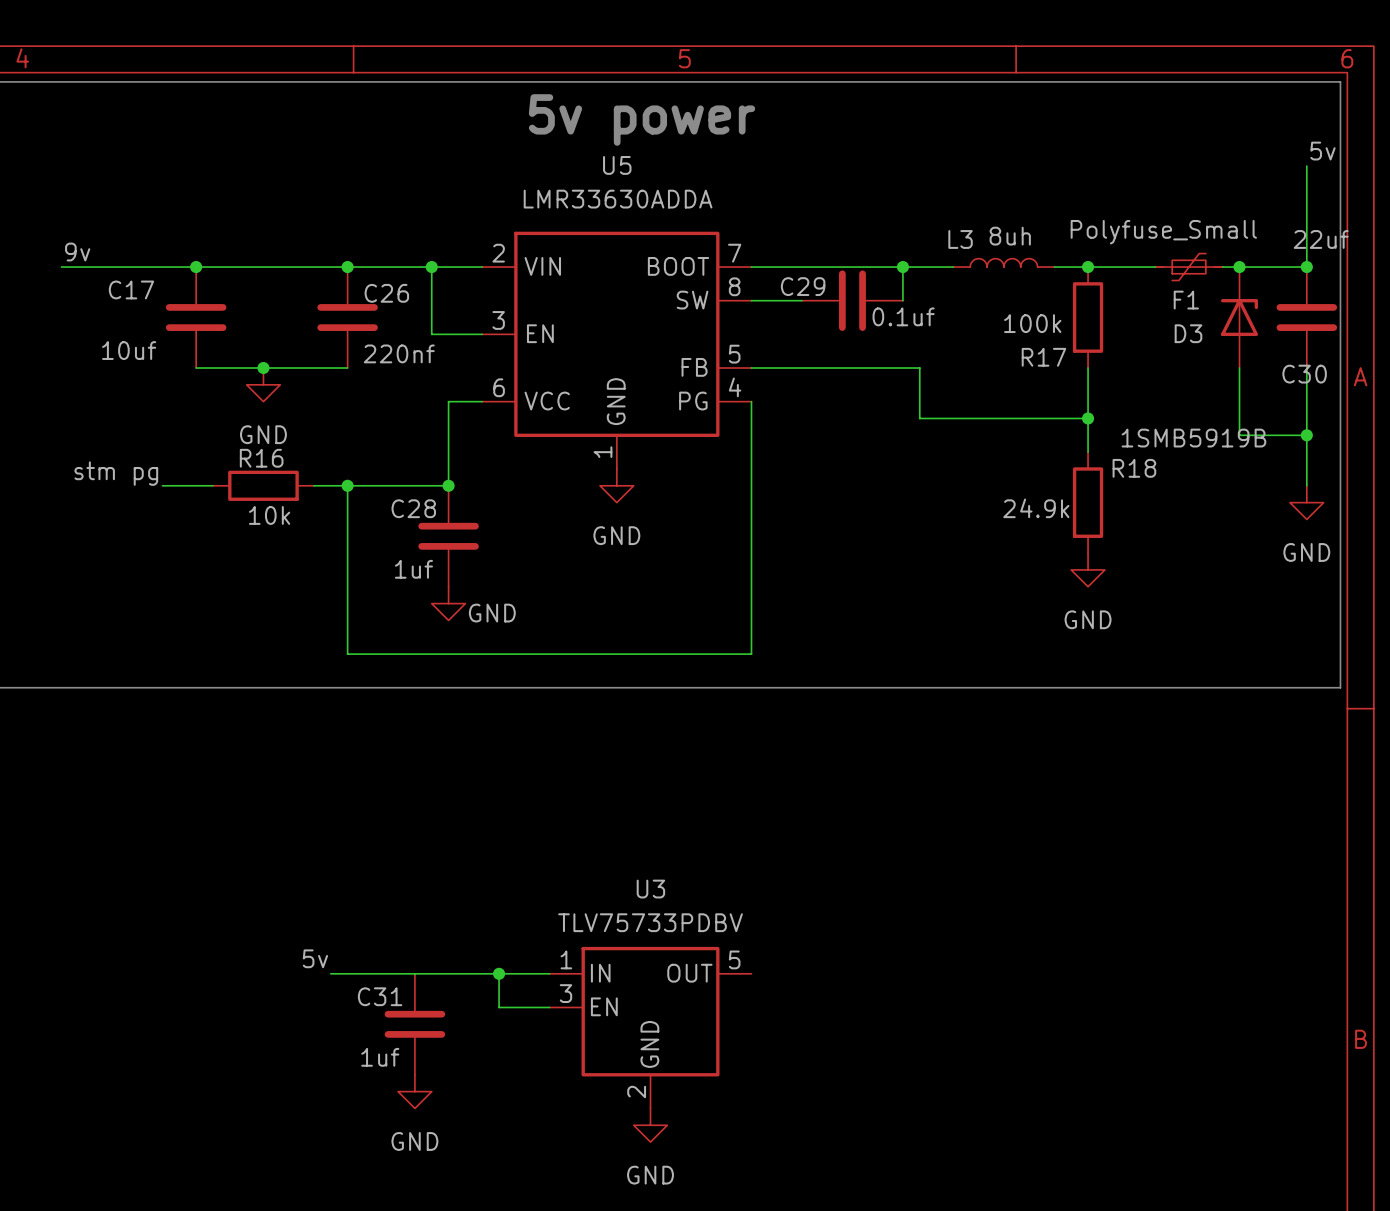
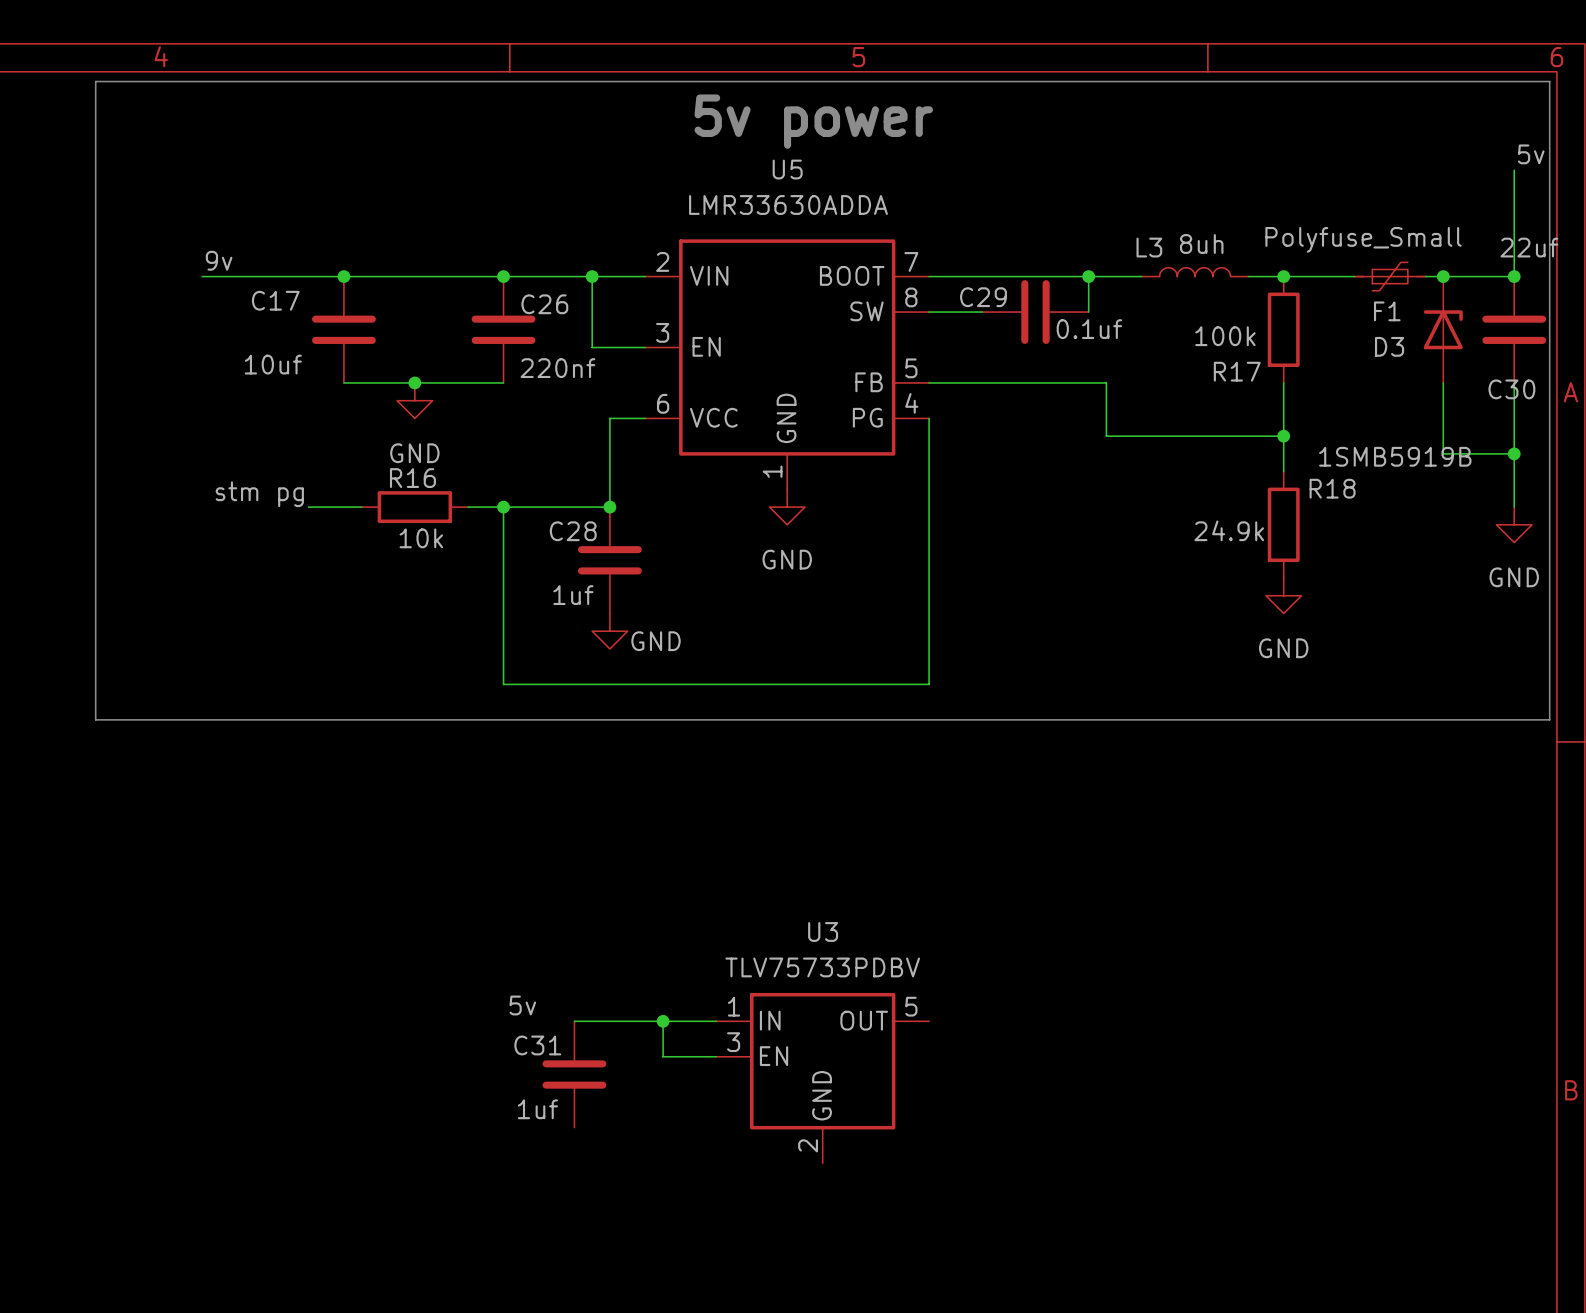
label position: 5v (315, 958) -> 5v (522, 1005)
wire: (330, 973) (414, 973) -> none
power symbol: GND (414, 1091) -> none
power symbol: GND (650, 1125) -> none

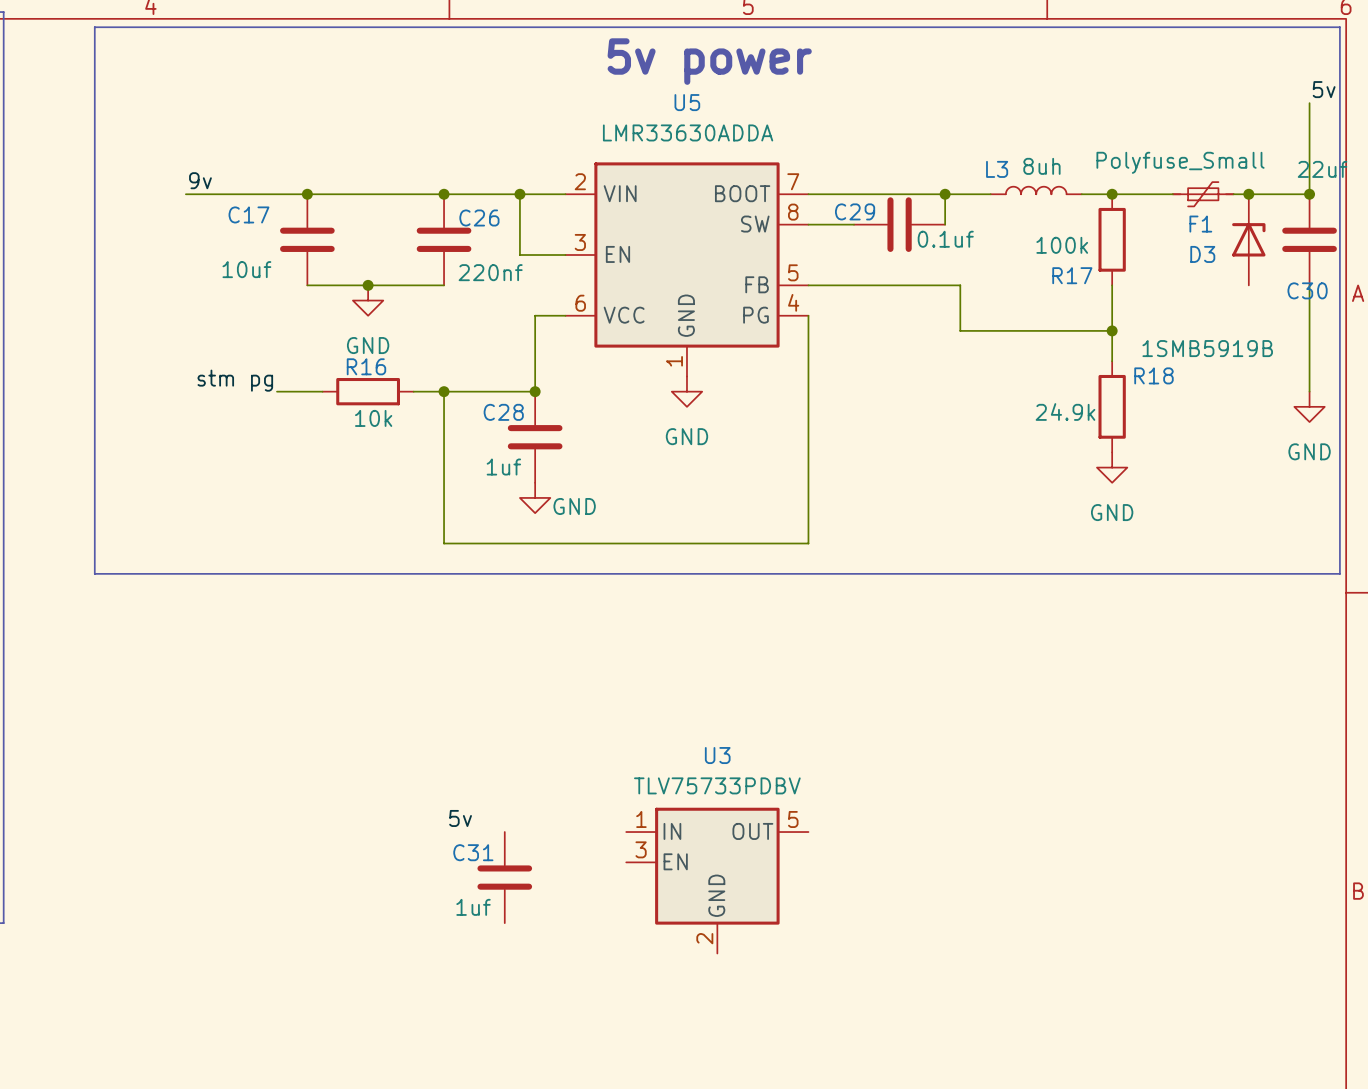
wire: (1443, 382) (1443, 453) (1514, 453) -> none
junction: (1514, 453) -> none
wire: (574, 1021) (716, 1021) -> none
wire: (663, 1021) (663, 1056) (716, 1056) -> none
junction: (663, 1021) -> none

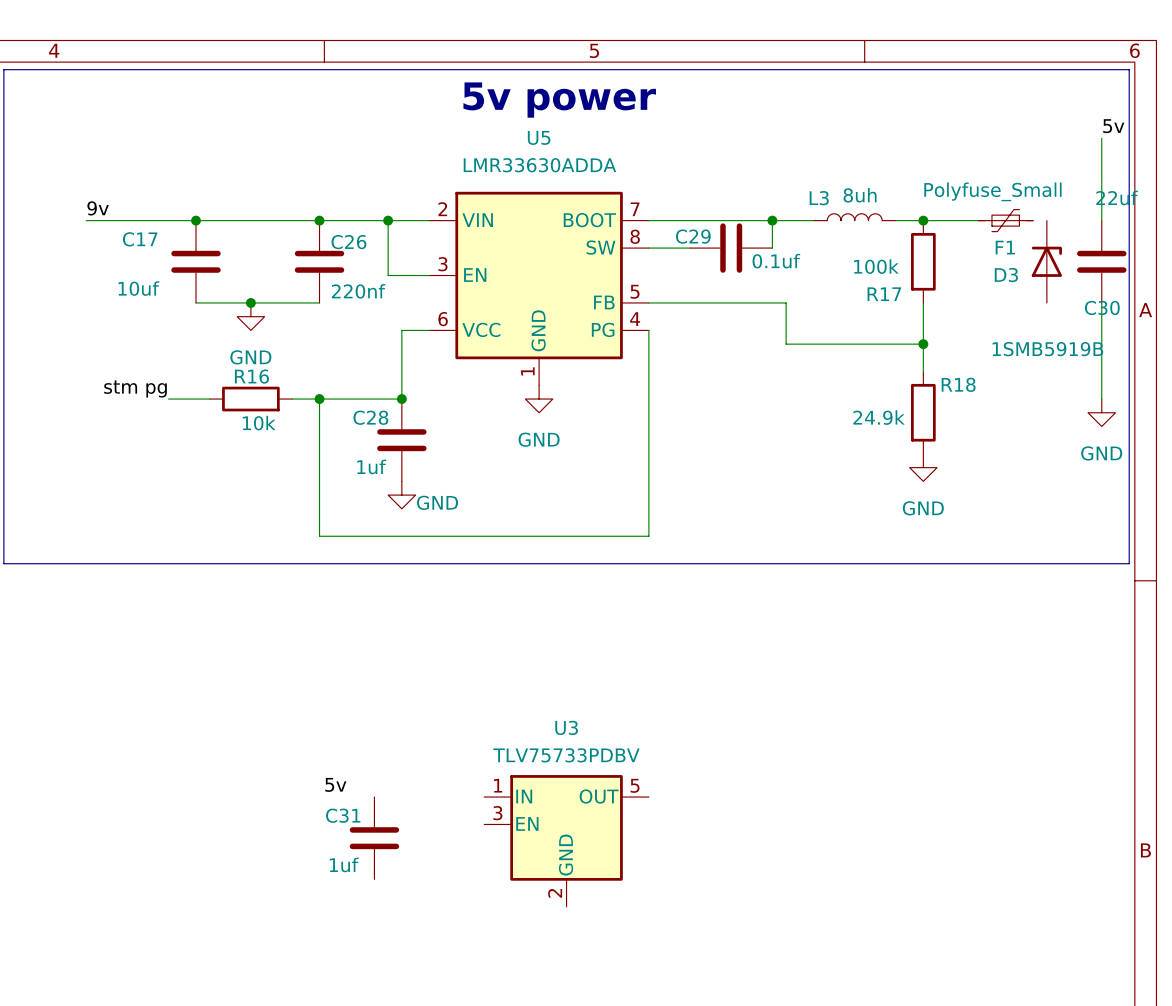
wire: (1233, 194) (1309, 194) -> none
junction: (1248, 194) -> none
junction: (1309, 194) -> none
D3 value position: 1SMB5919B (1207, 348) -> 1SMB5919B (1047, 349)

